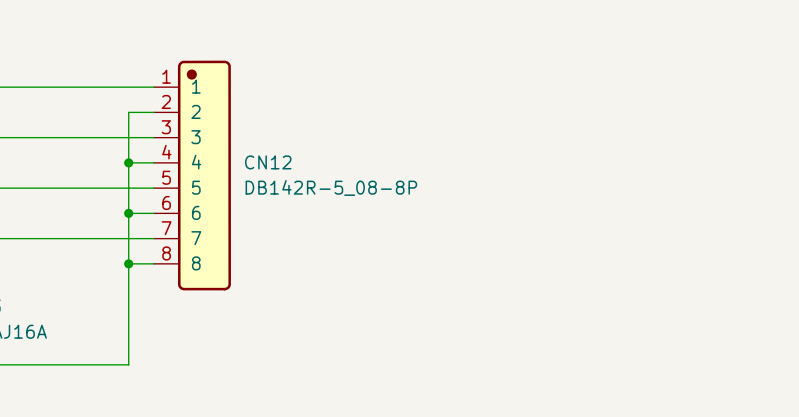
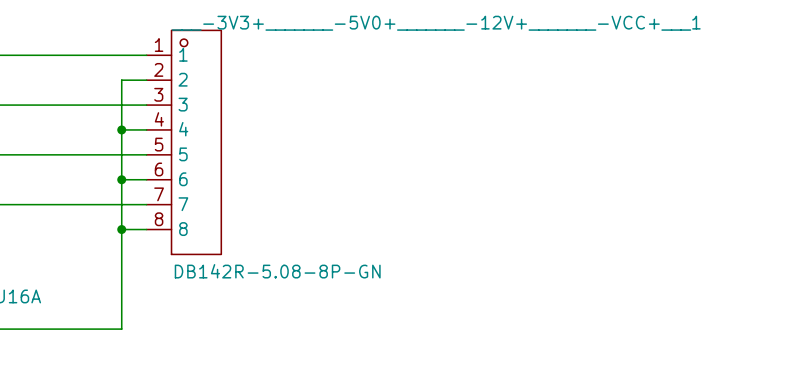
___-3V3+_______-5V0+_______-12V+_______-VCC+___1: none -> DB142R-5.08-8P-GN (183, 142)
CN12: DB142R-5_08-8P (192, 175) -> none

